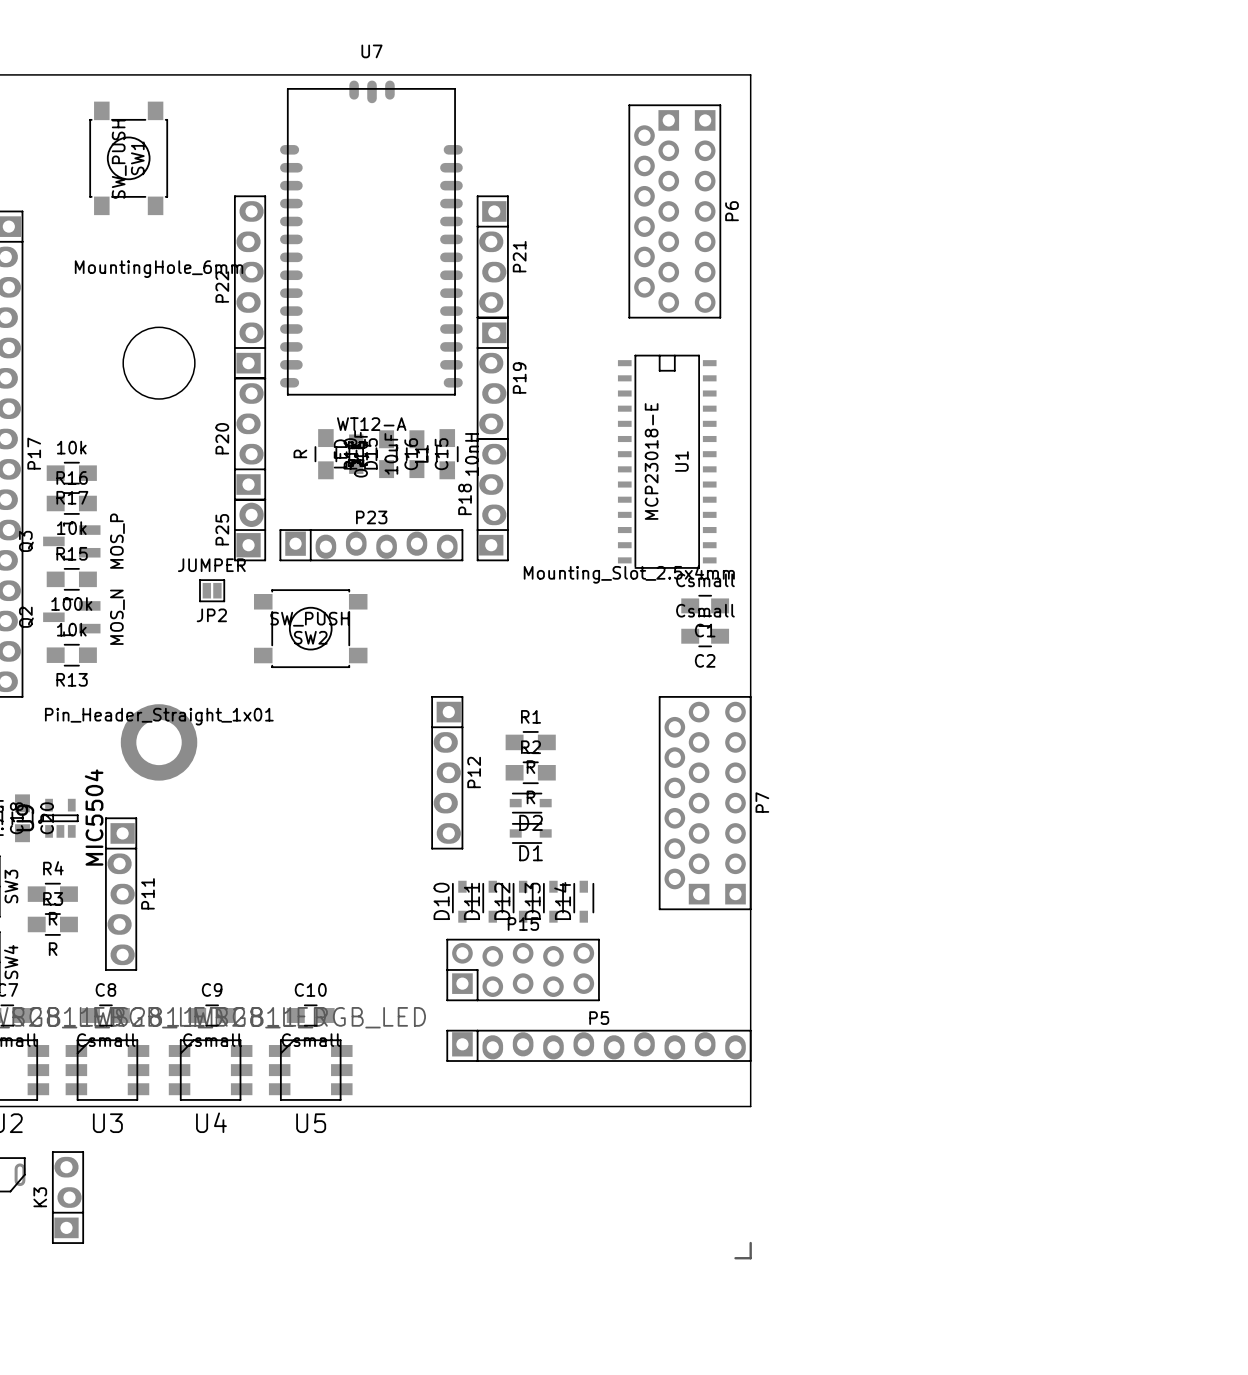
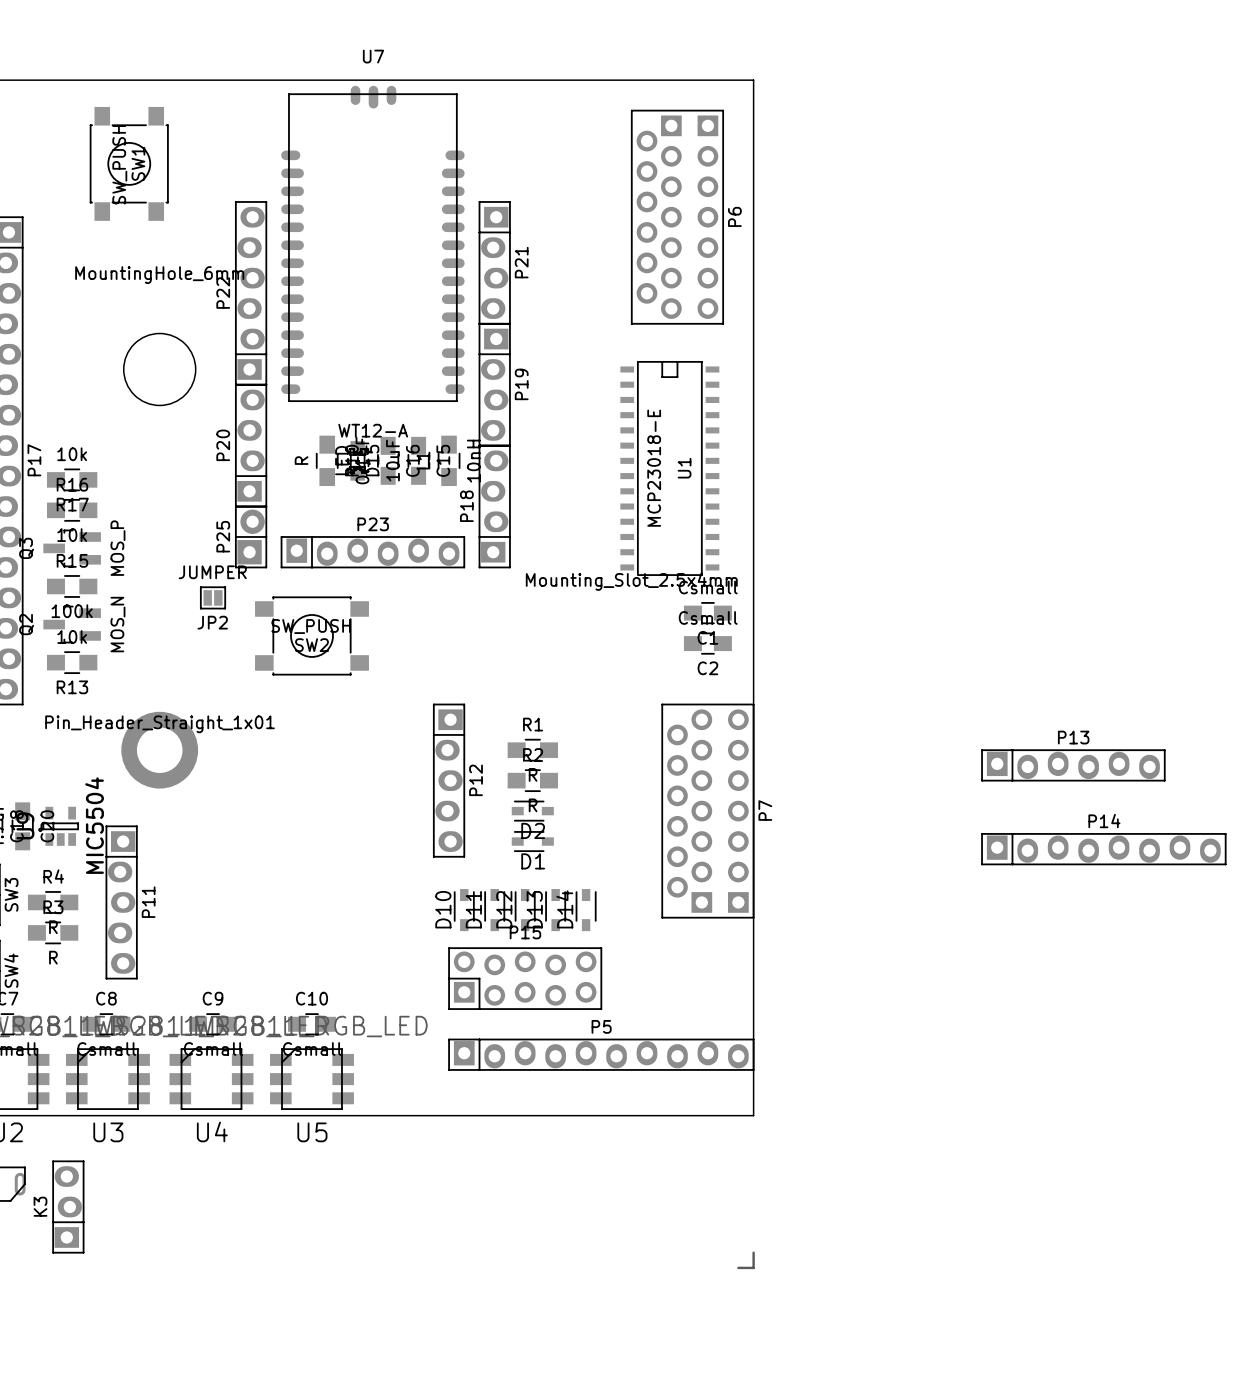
P13: none -> (1073, 765)
P14: none -> (1103, 849)

